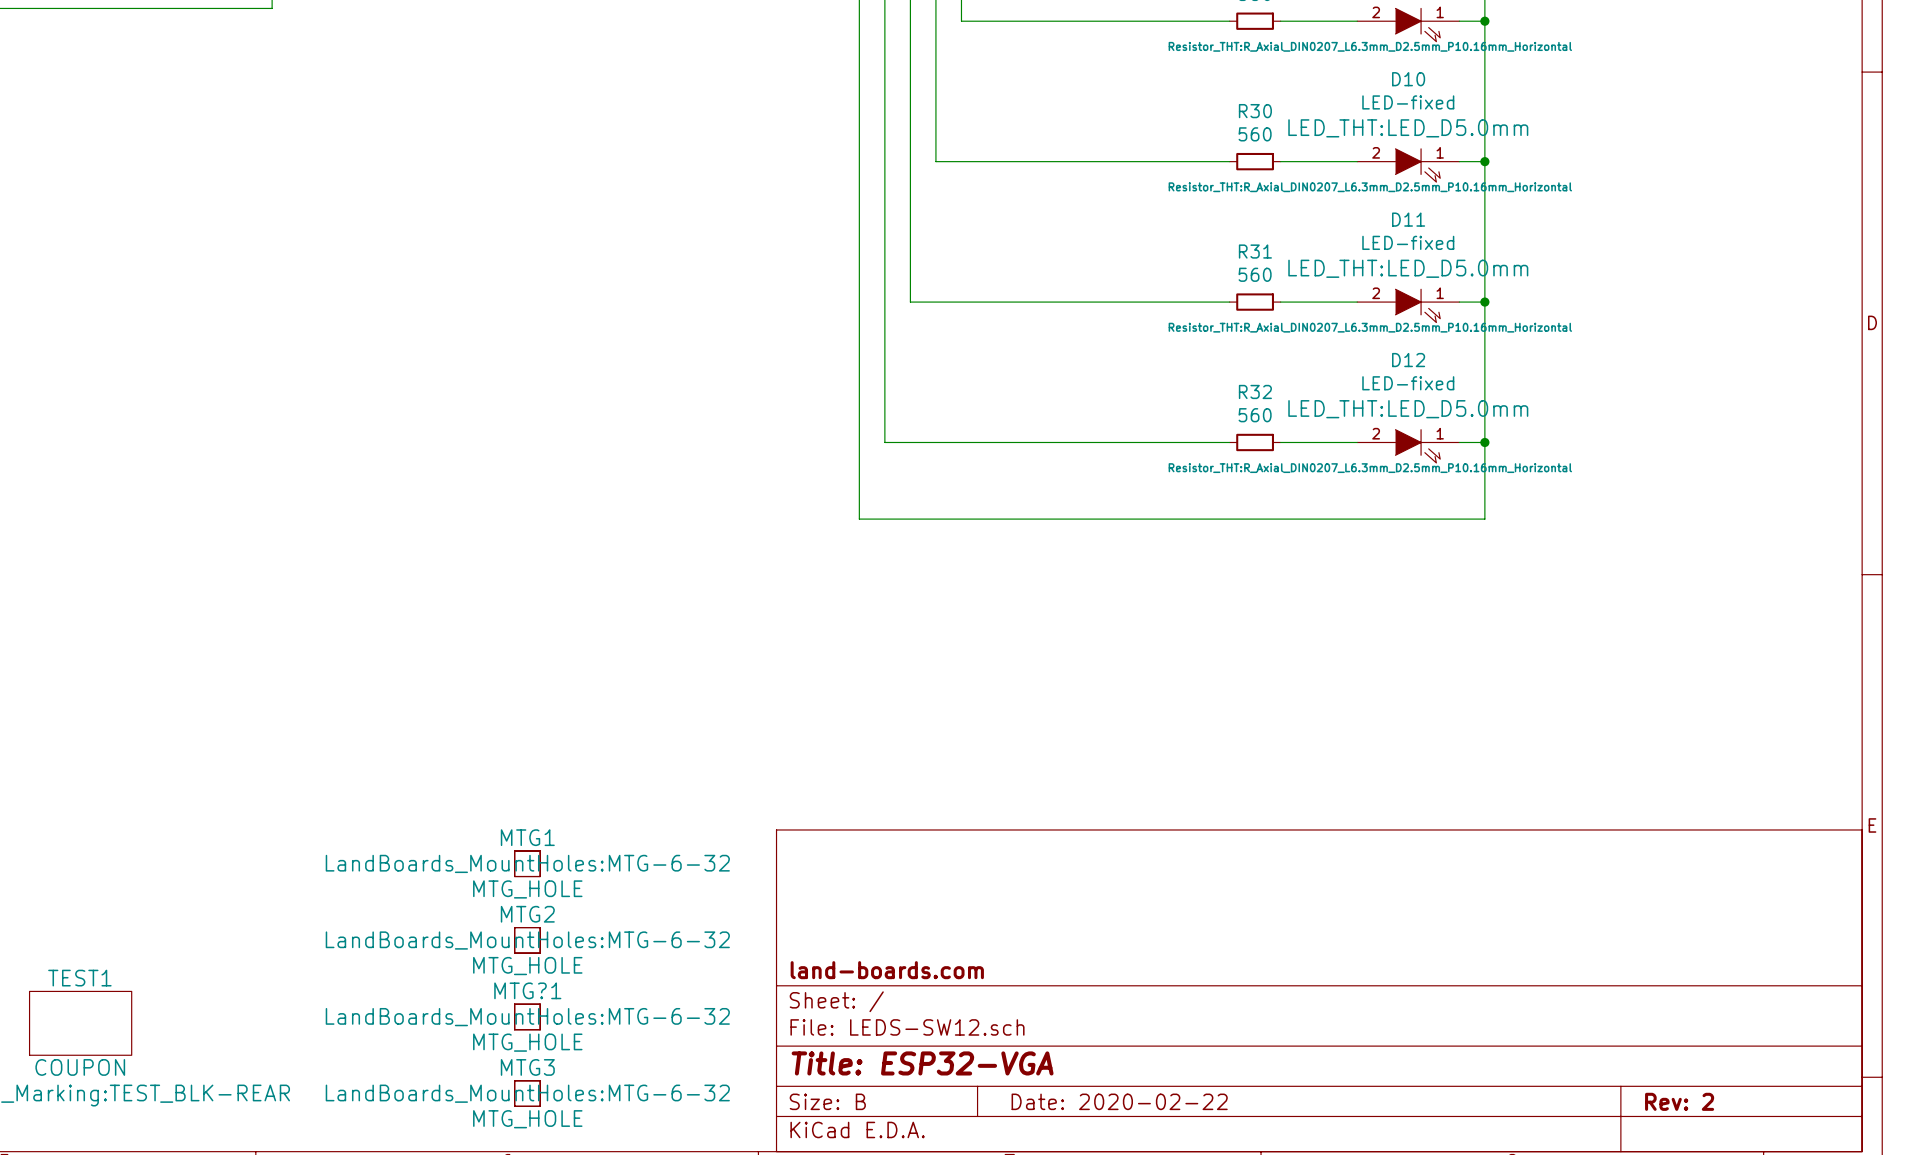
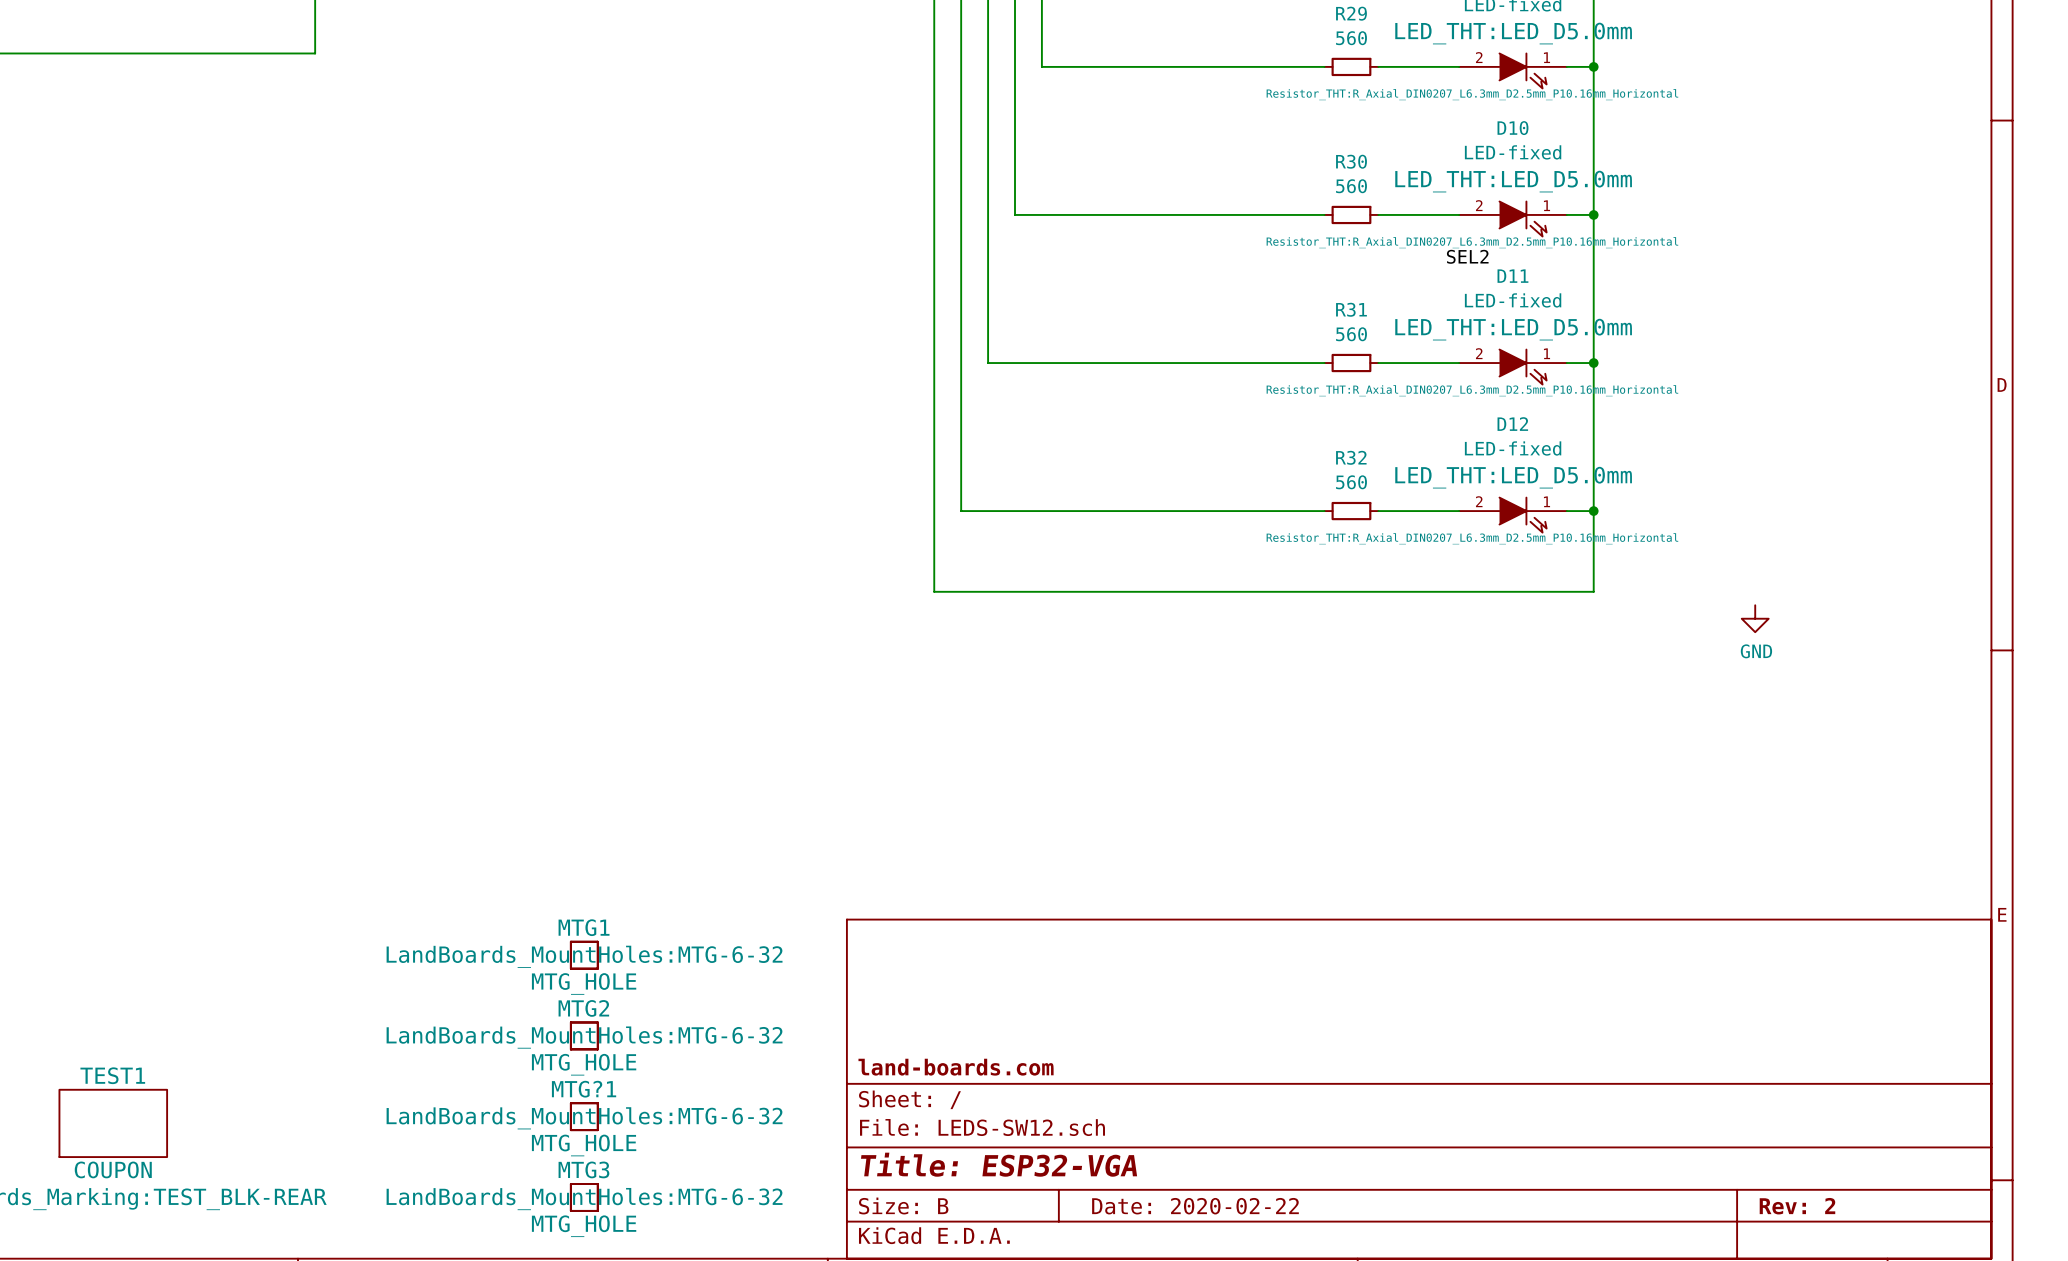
label: none -> SEL2 (1467, 256)
power symbol: none -> GND (1755, 618)

